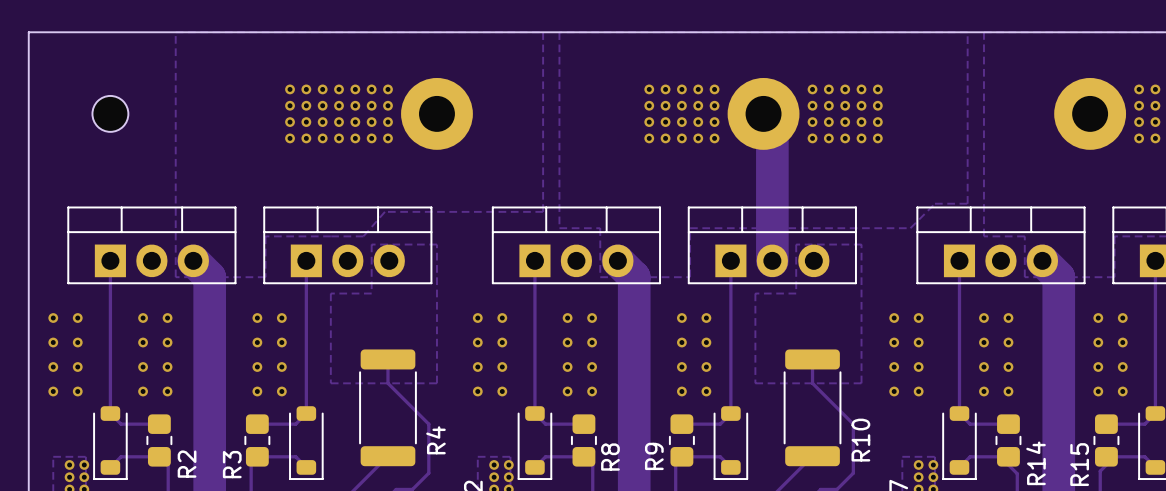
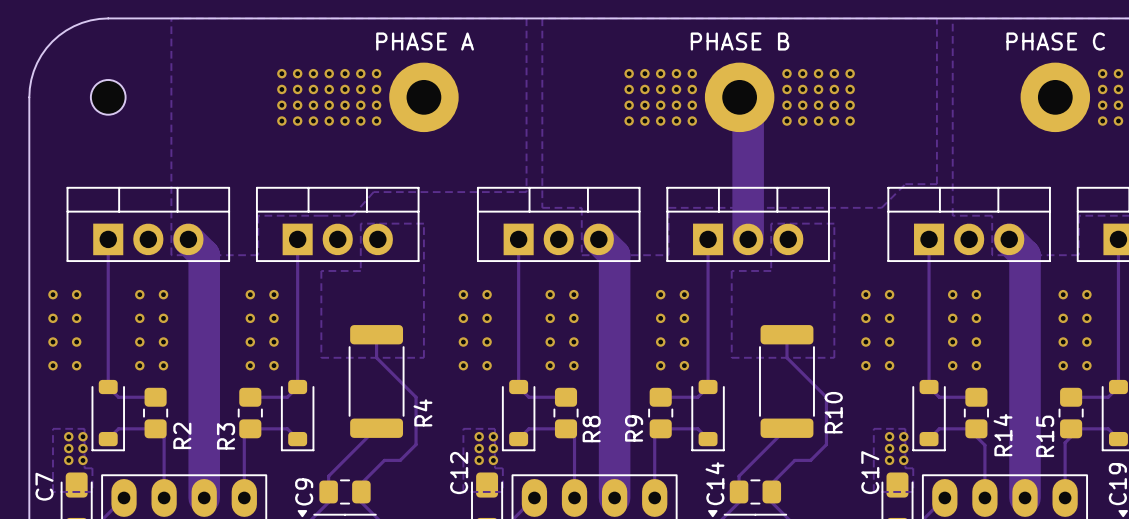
board edge: (110, 32) (28, 32) (28, 113) -> (108, 18) (82, 22) (66, 30) (52, 41) (37, 63) (31, 79) (29, 97)
part value: none -> PHASE A (425, 41)
part value: none -> PHASE B (740, 41)
part value: none -> PHASE C (1055, 41)

